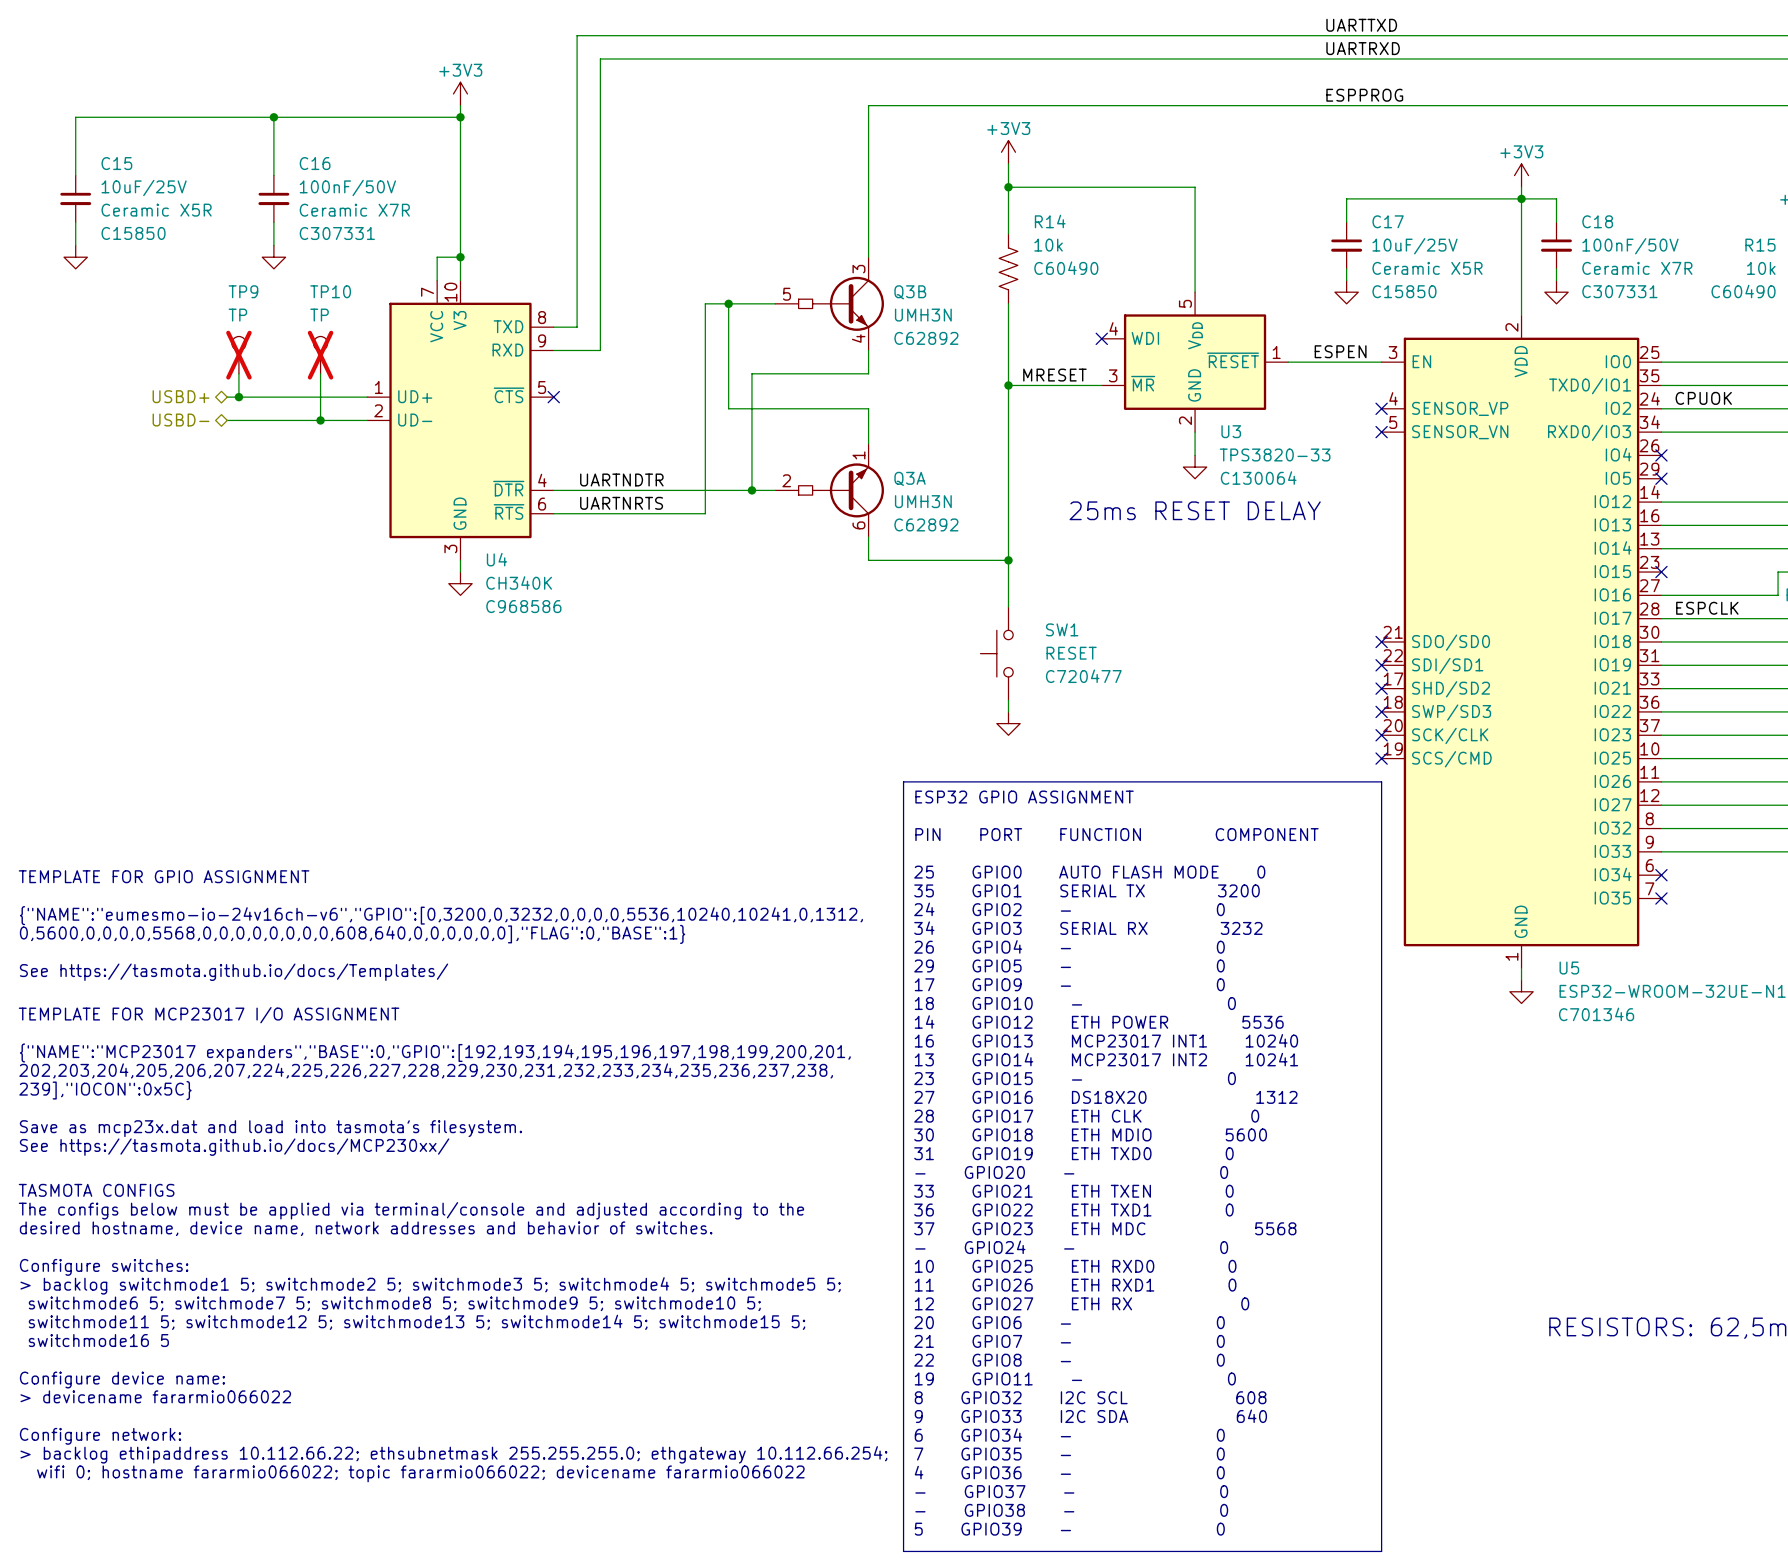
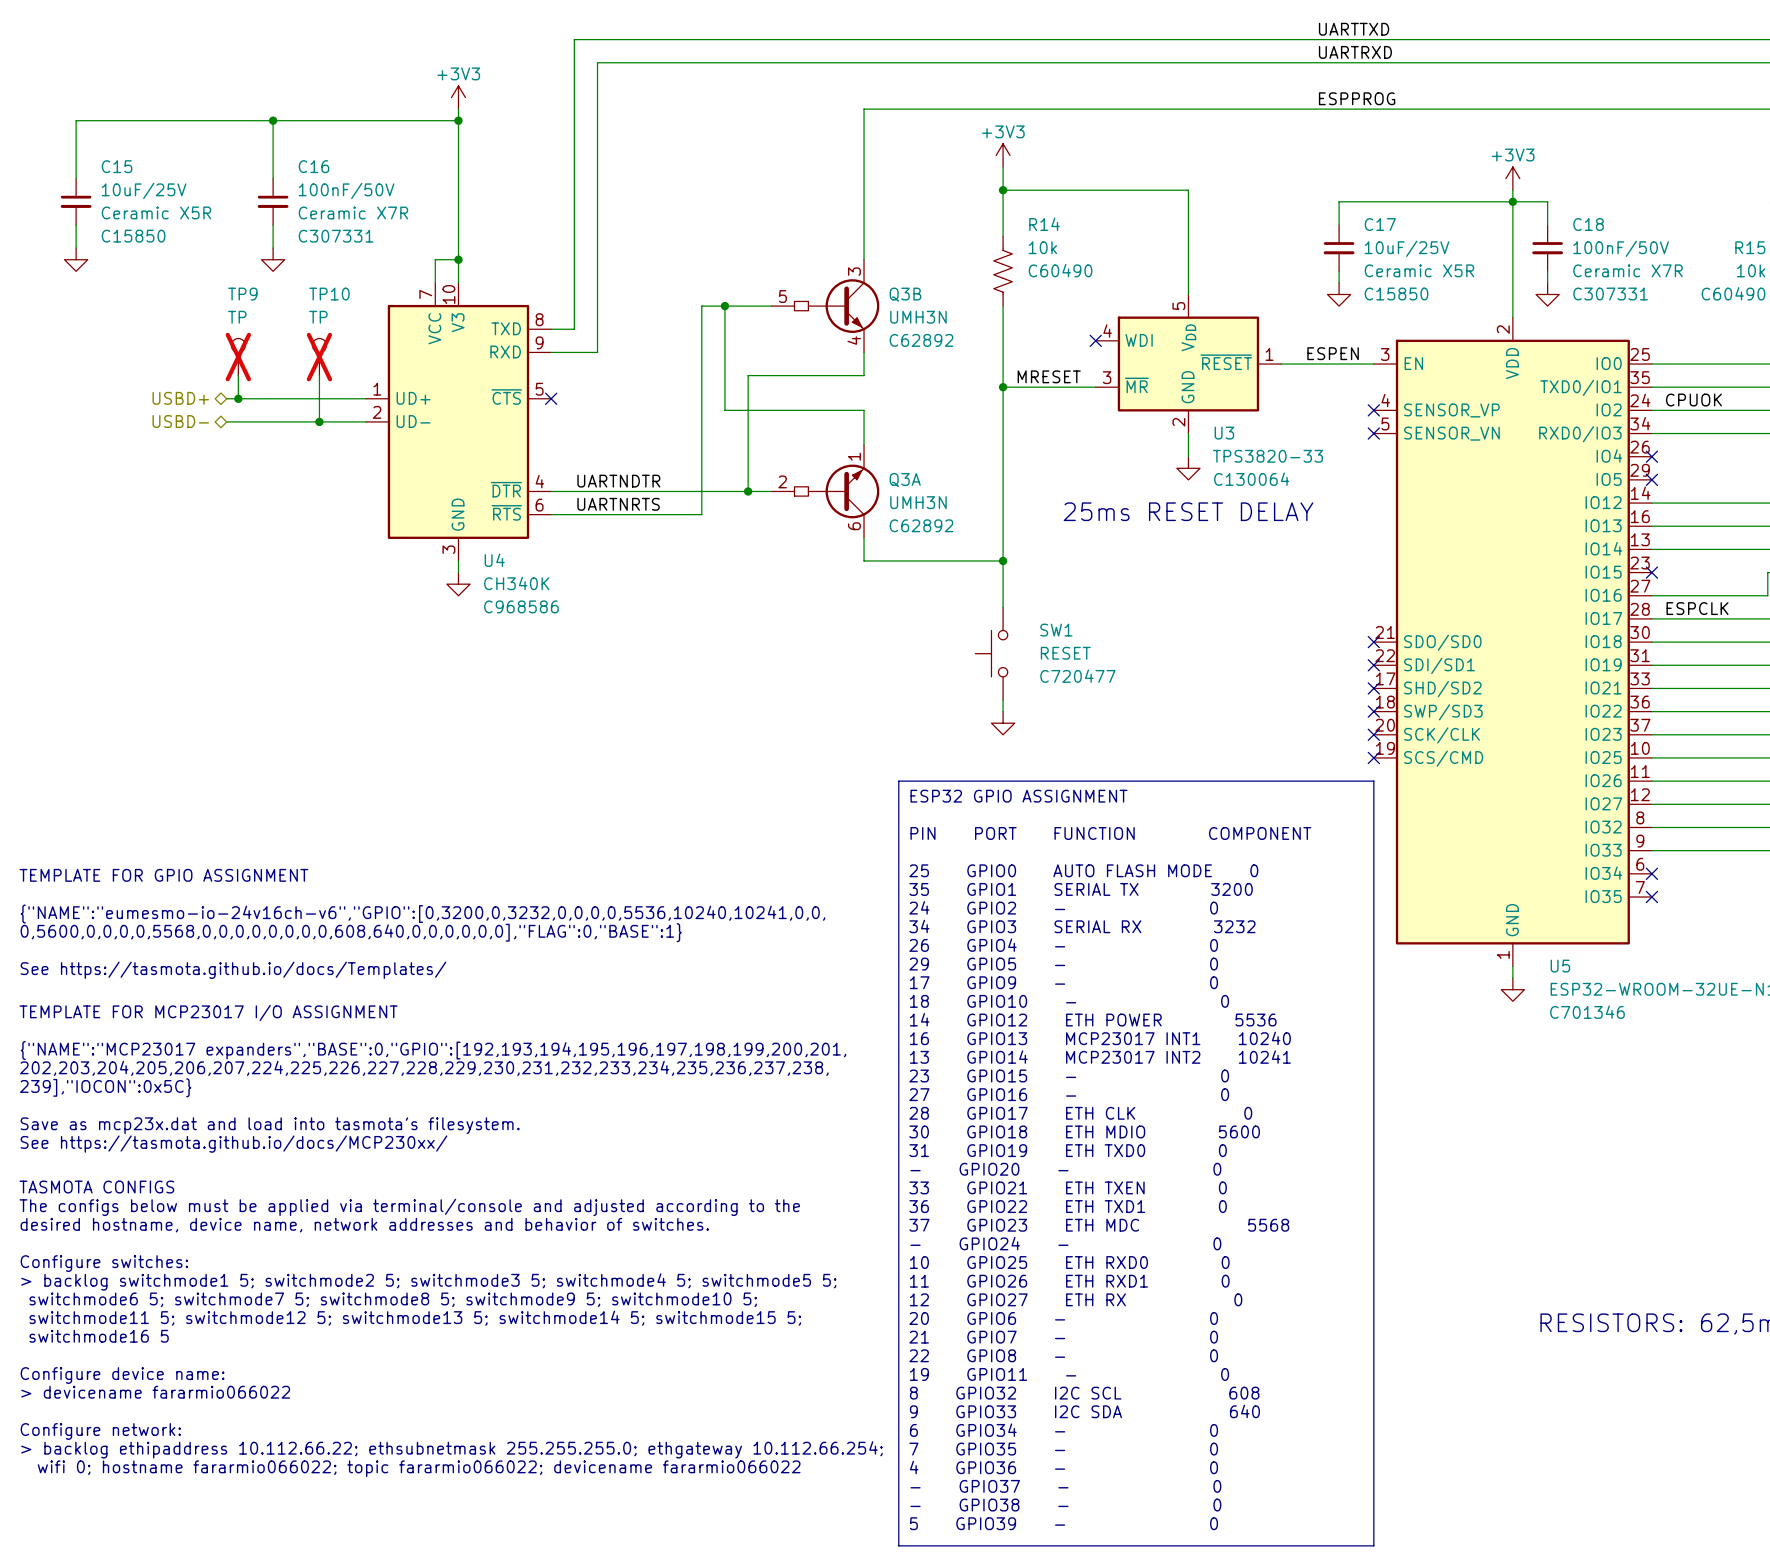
text: {"NAME":"eumesmo-io-24v16ch-v6","GPIO":[0,3200,0,3232,0,0,0,0,5536,10240,10241,0,1312, (441, 915) -> {"NAME":"eumesmo-io-24v16ch-v6","GPIO":[0,3200,0,3232,0,0,0,0,5536,10240,10241,0,0, (422, 914)
text: 27 GPIO16 DS18X20 1312 (1105, 1097) -> 27 GPIO16 - 0 (1069, 1094)

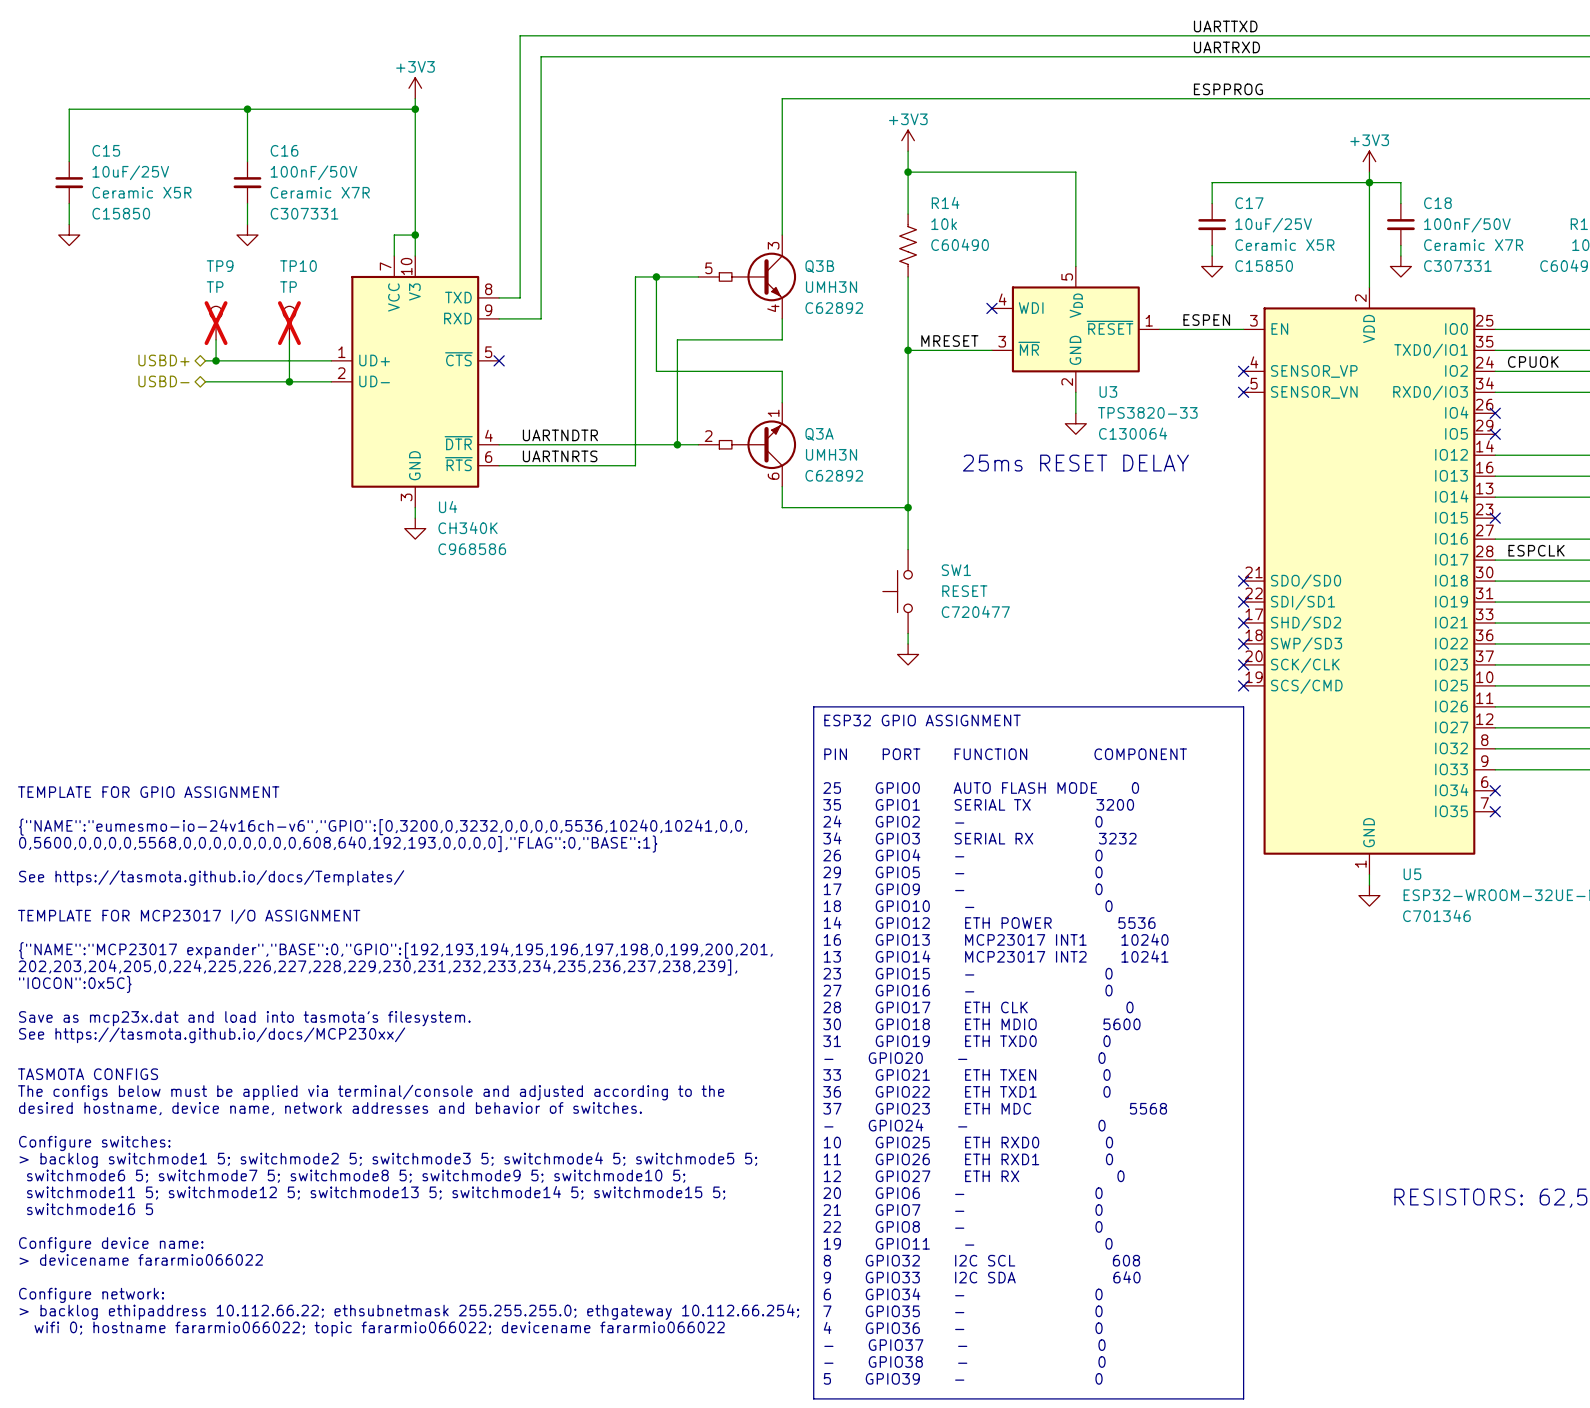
text: 0,5600,0,0,0,0,5568,0,0,0,0,0,0,0,0,608,640,0,0,0,0,0,0],"FLAG":0,"BASE":1} (351, 932) -> 0,5600,0,0,0,0,5568,0,0,0,0,0,0,0,0,608,640,192,193,0,0,0,0],"FLAG":0,"BASE":1} (338, 844)
text: {"NAME":"MCP23017 expanders","BASE":0,"GPIO":[192,193,194,195,196,197,198,199,200,201, (433, 1050) -> {"NAME":"MCP23017 expander","BASE":0,"GPIO":[192,193,194,195,196,197,198,0,199,200,201, (395, 950)
text: 202,203,204,205,206,207,224,225,226,227,228,229,230,231,232,233,234,235,236,237,238, (424, 1068) -> 202,203,204,205,0,224,225,226,227,228,229,230,231,232,233,234,235,236,237,238,239], (377, 967)
text: 239],"IOCON":0x5C} (105, 1087) -> "IOCON":0x5C} (75, 984)

